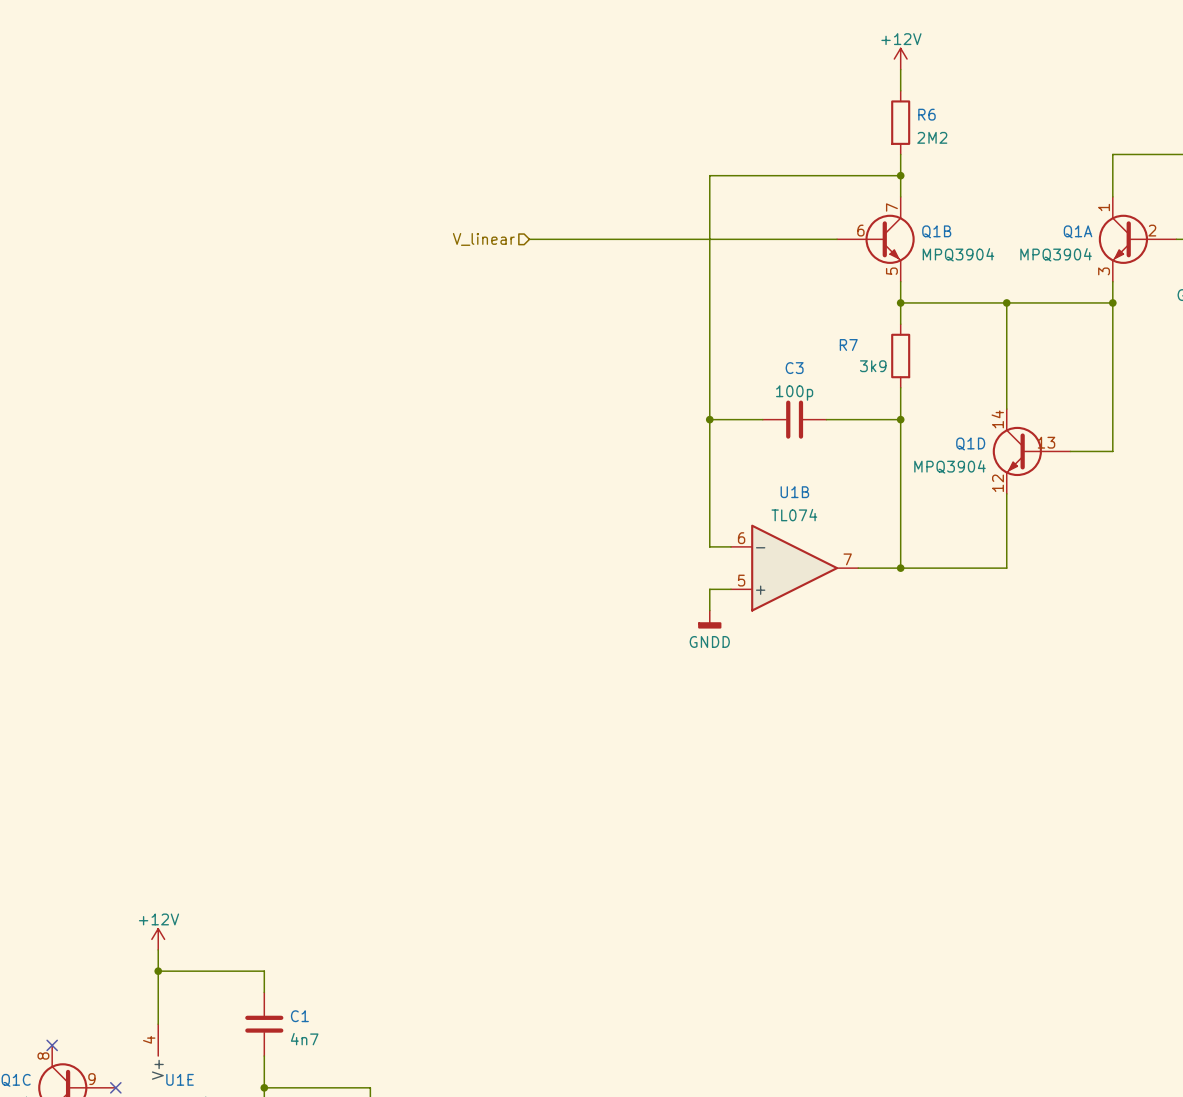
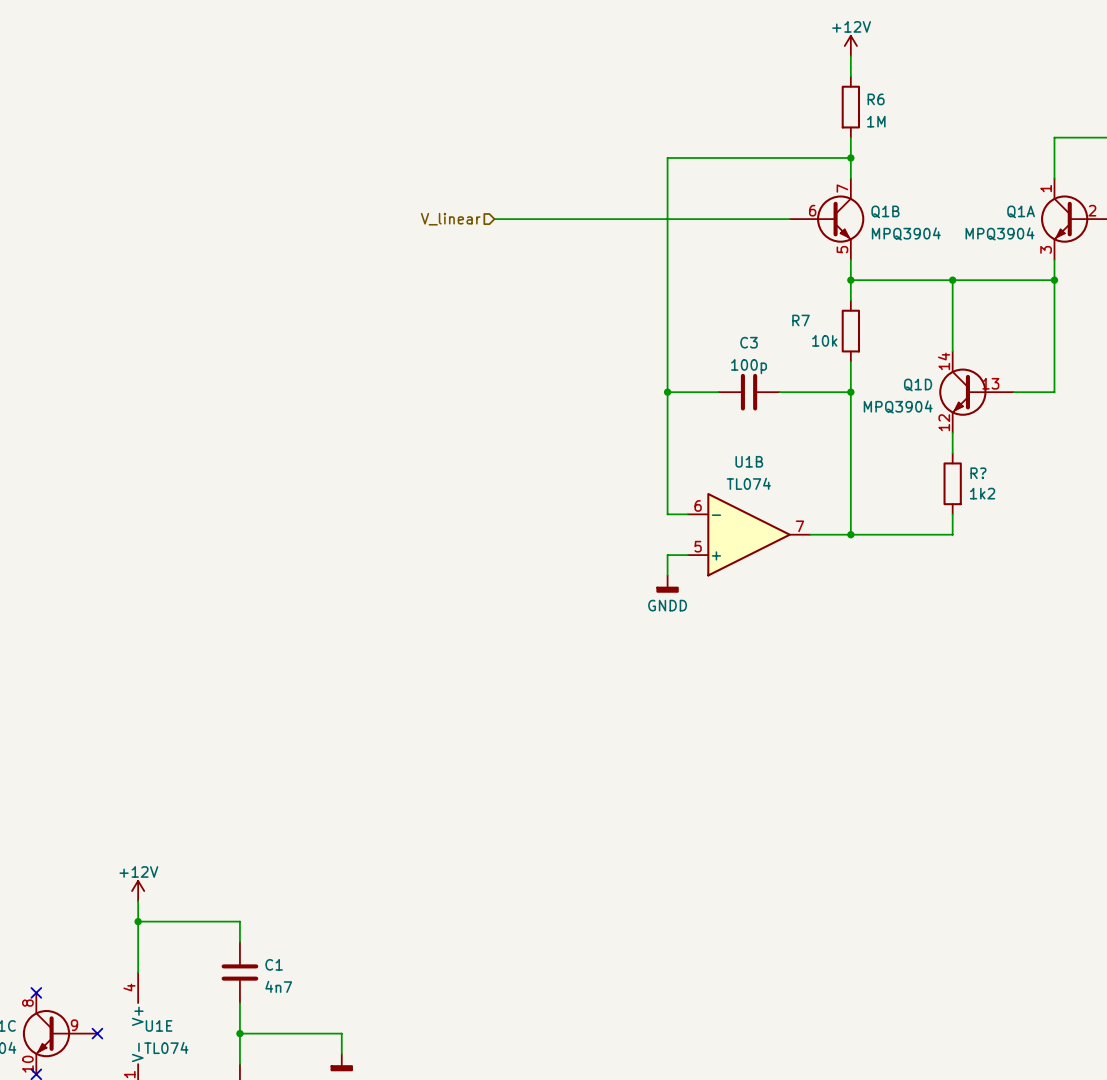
R6 value: 2M2 (932, 137) -> 1M (876, 121)
R7 value: 3k9 (873, 366) -> 10k (824, 340)
wire: (1112, 419) (1112, 451) (1070, 451) -> (1054, 392) (1013, 392)
Q1D position: (1031, 451) -> (976, 392)
wire: (1006, 493) (1006, 546) -> none
R?: none -> 1k2 (952, 483)

